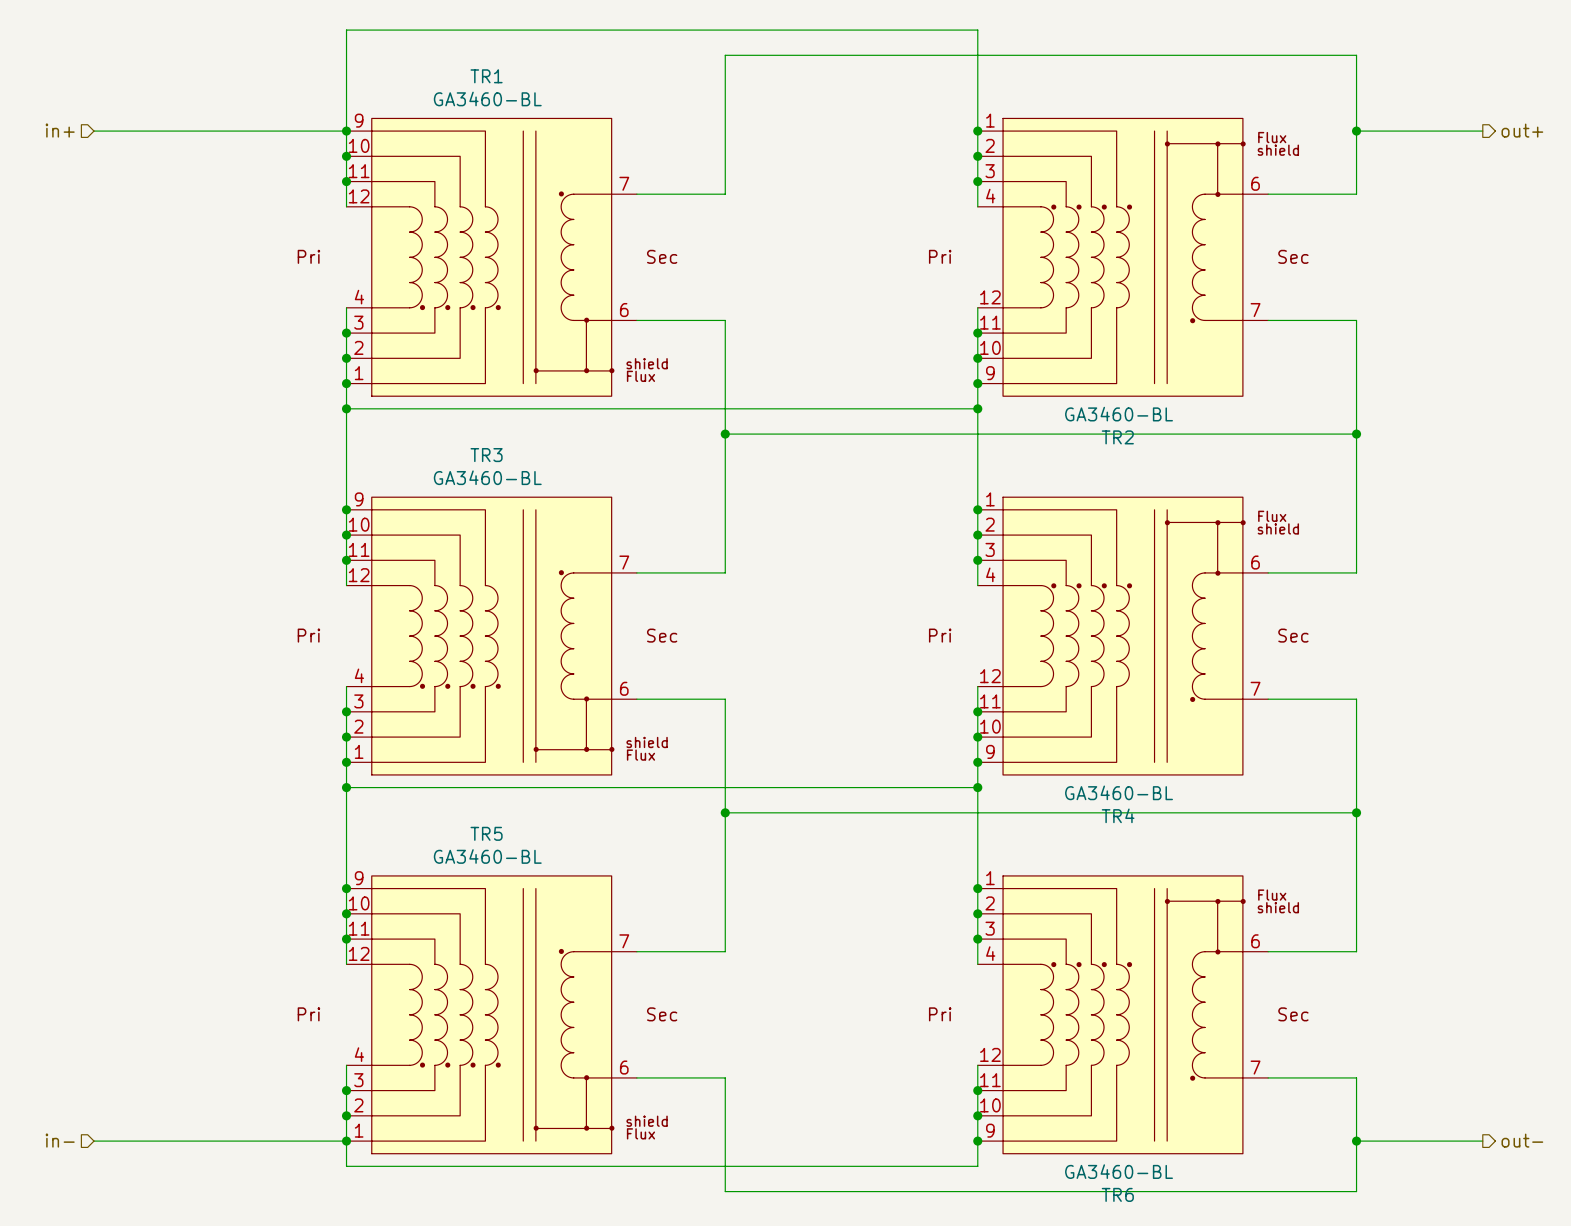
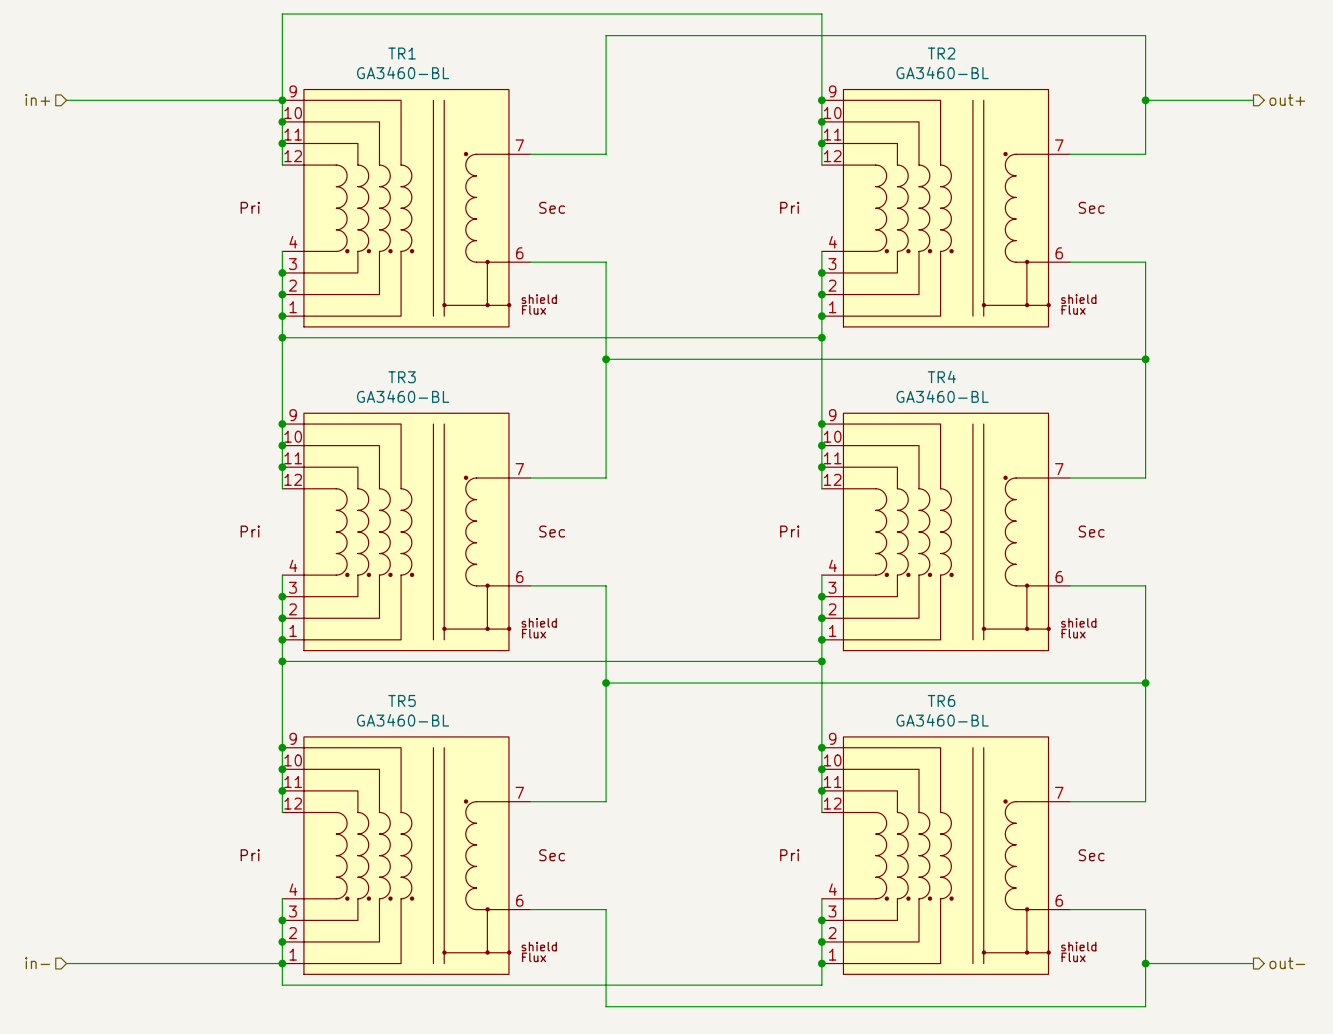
TR2 flip: as is (1124, 257) -> up-down (947, 208)
TR4 flip: as is (1124, 636) -> up-down (947, 531)
TR6 flip: as is (1124, 1014) -> up-down (947, 855)

